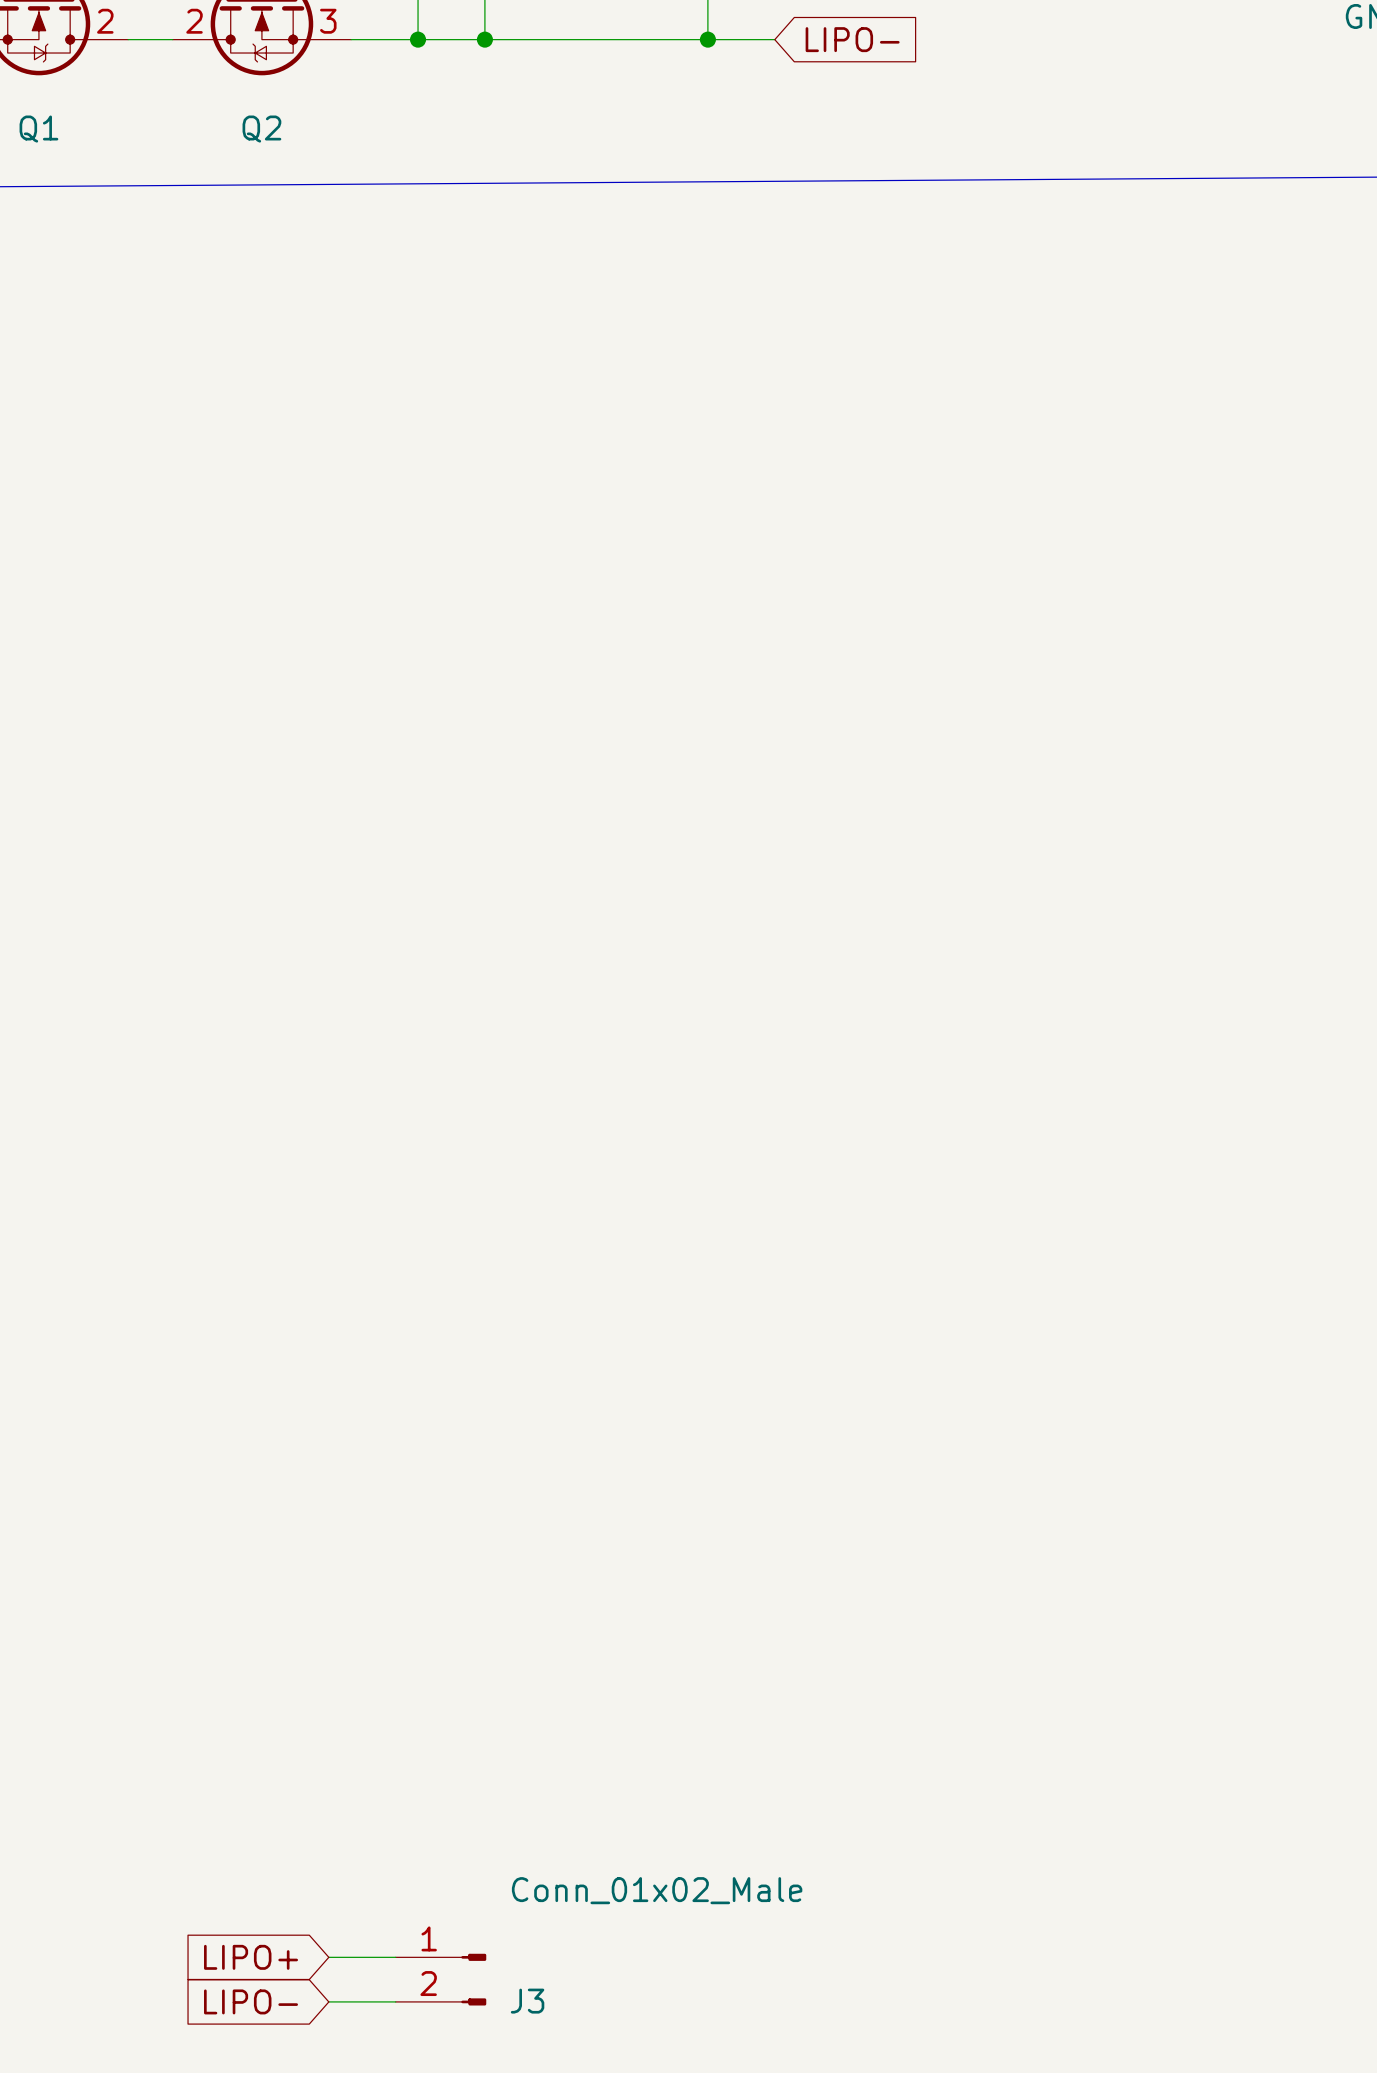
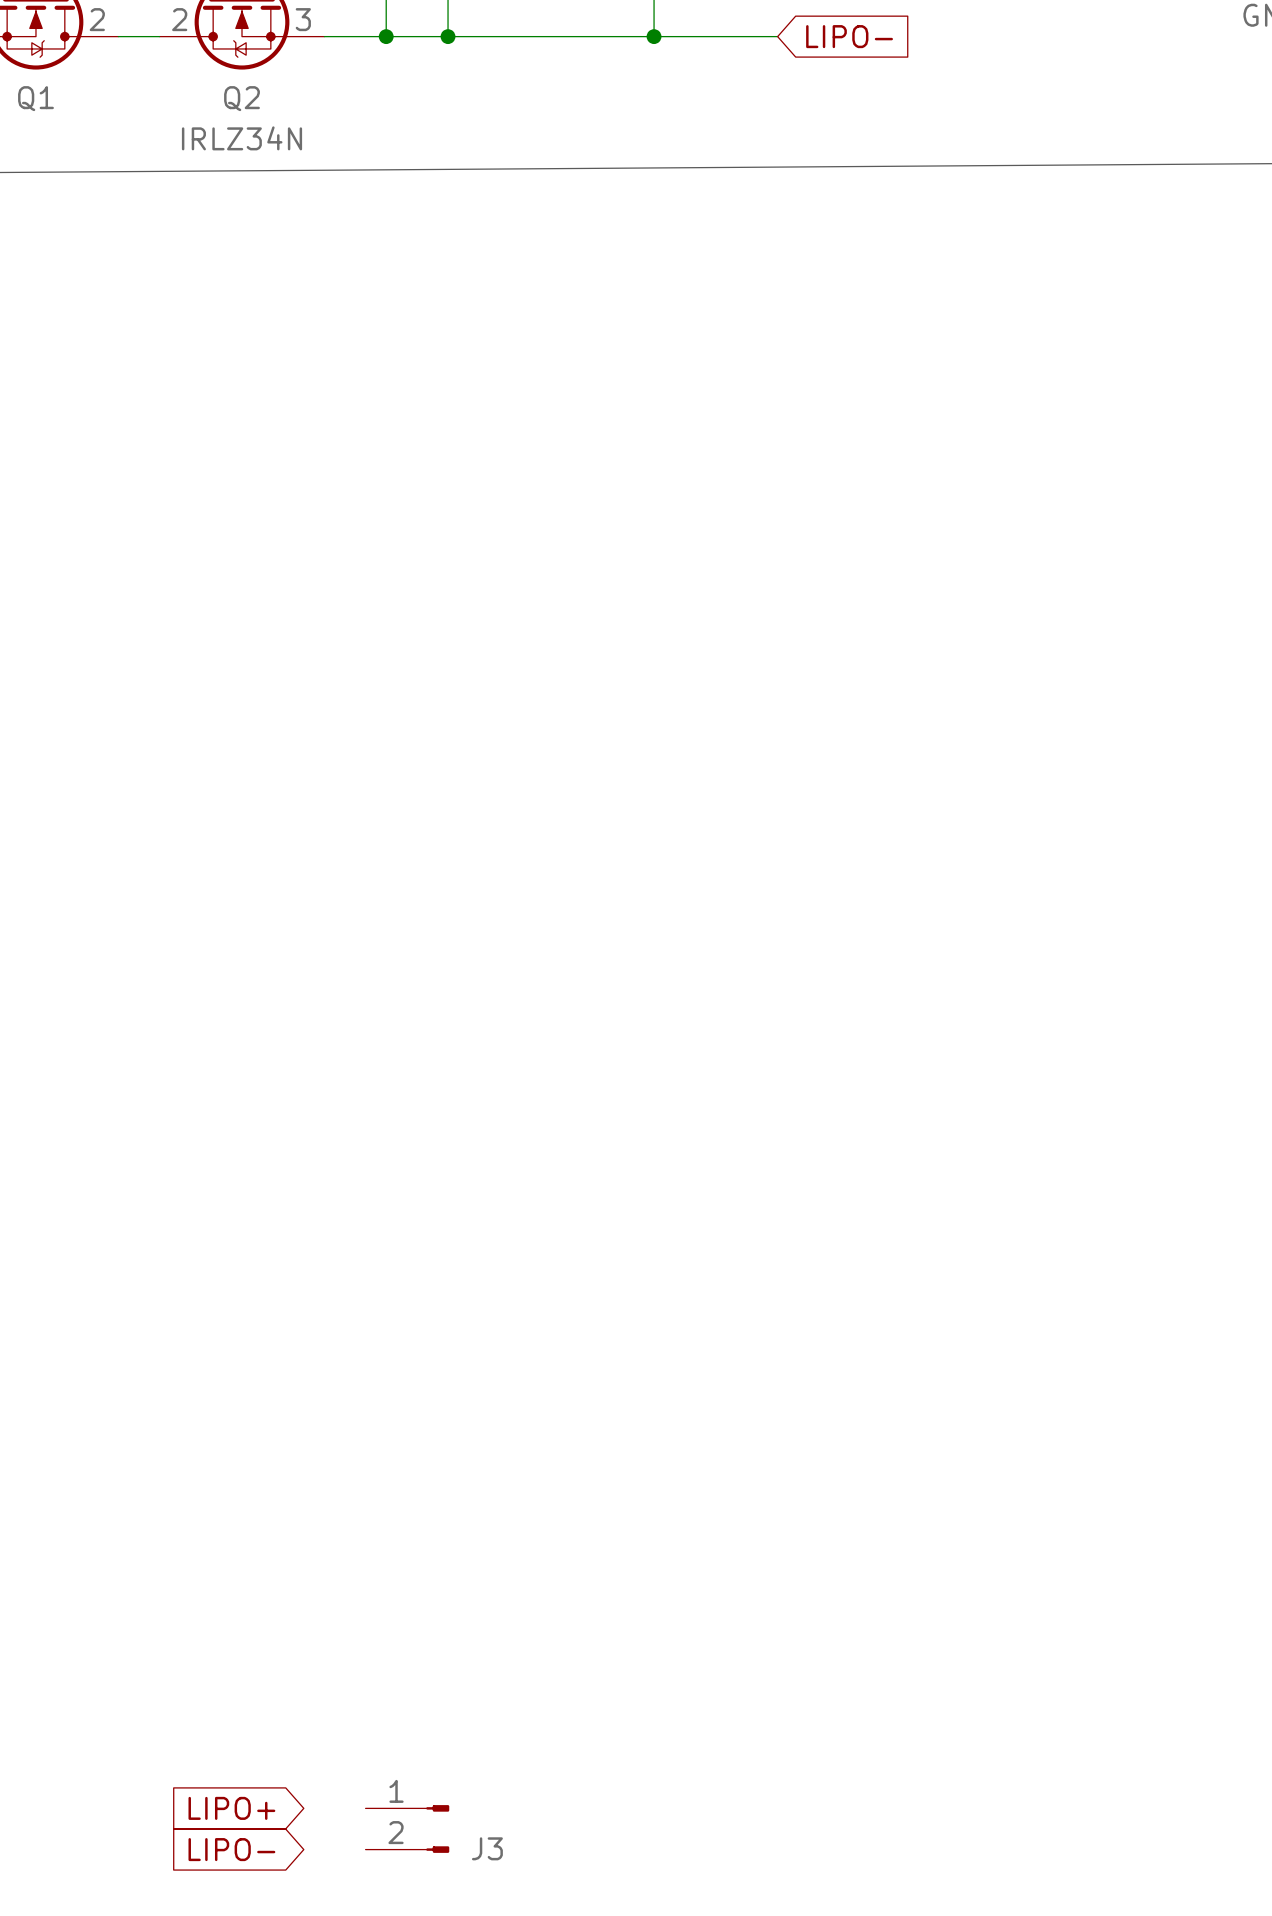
wire: none -> (715, 36) (777, 36)
global label position: LIPO- (852, 39) -> LIPO- (849, 36)
Q1 name position: Q1 (38, 129) -> Q1 (35, 98)
Q2 name position: Q2 (261, 129) -> Q2 (242, 98)
Q2 value: none -> IRLZ34N (242, 138)
J3 value: Conn_01x02_Male (657, 1890) -> none
wire: (328, 1957) (395, 1957) -> none
wire: (328, 2001) (395, 2001) -> none

